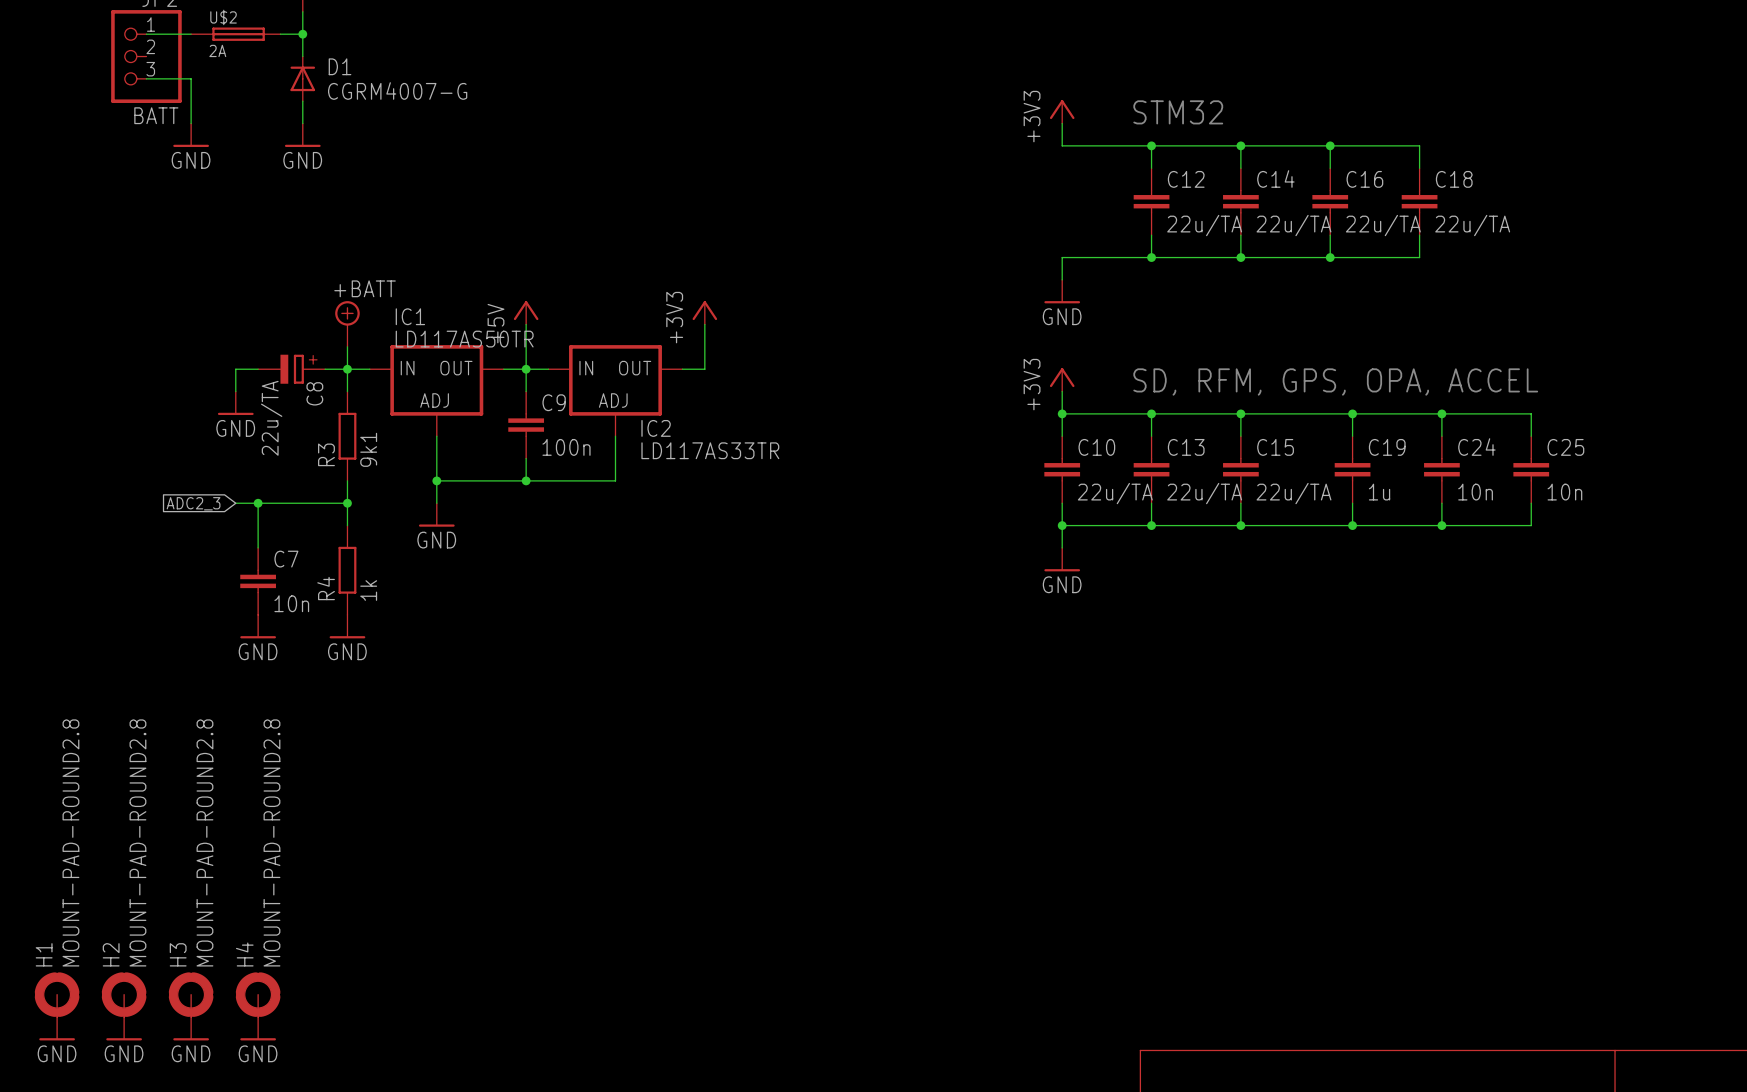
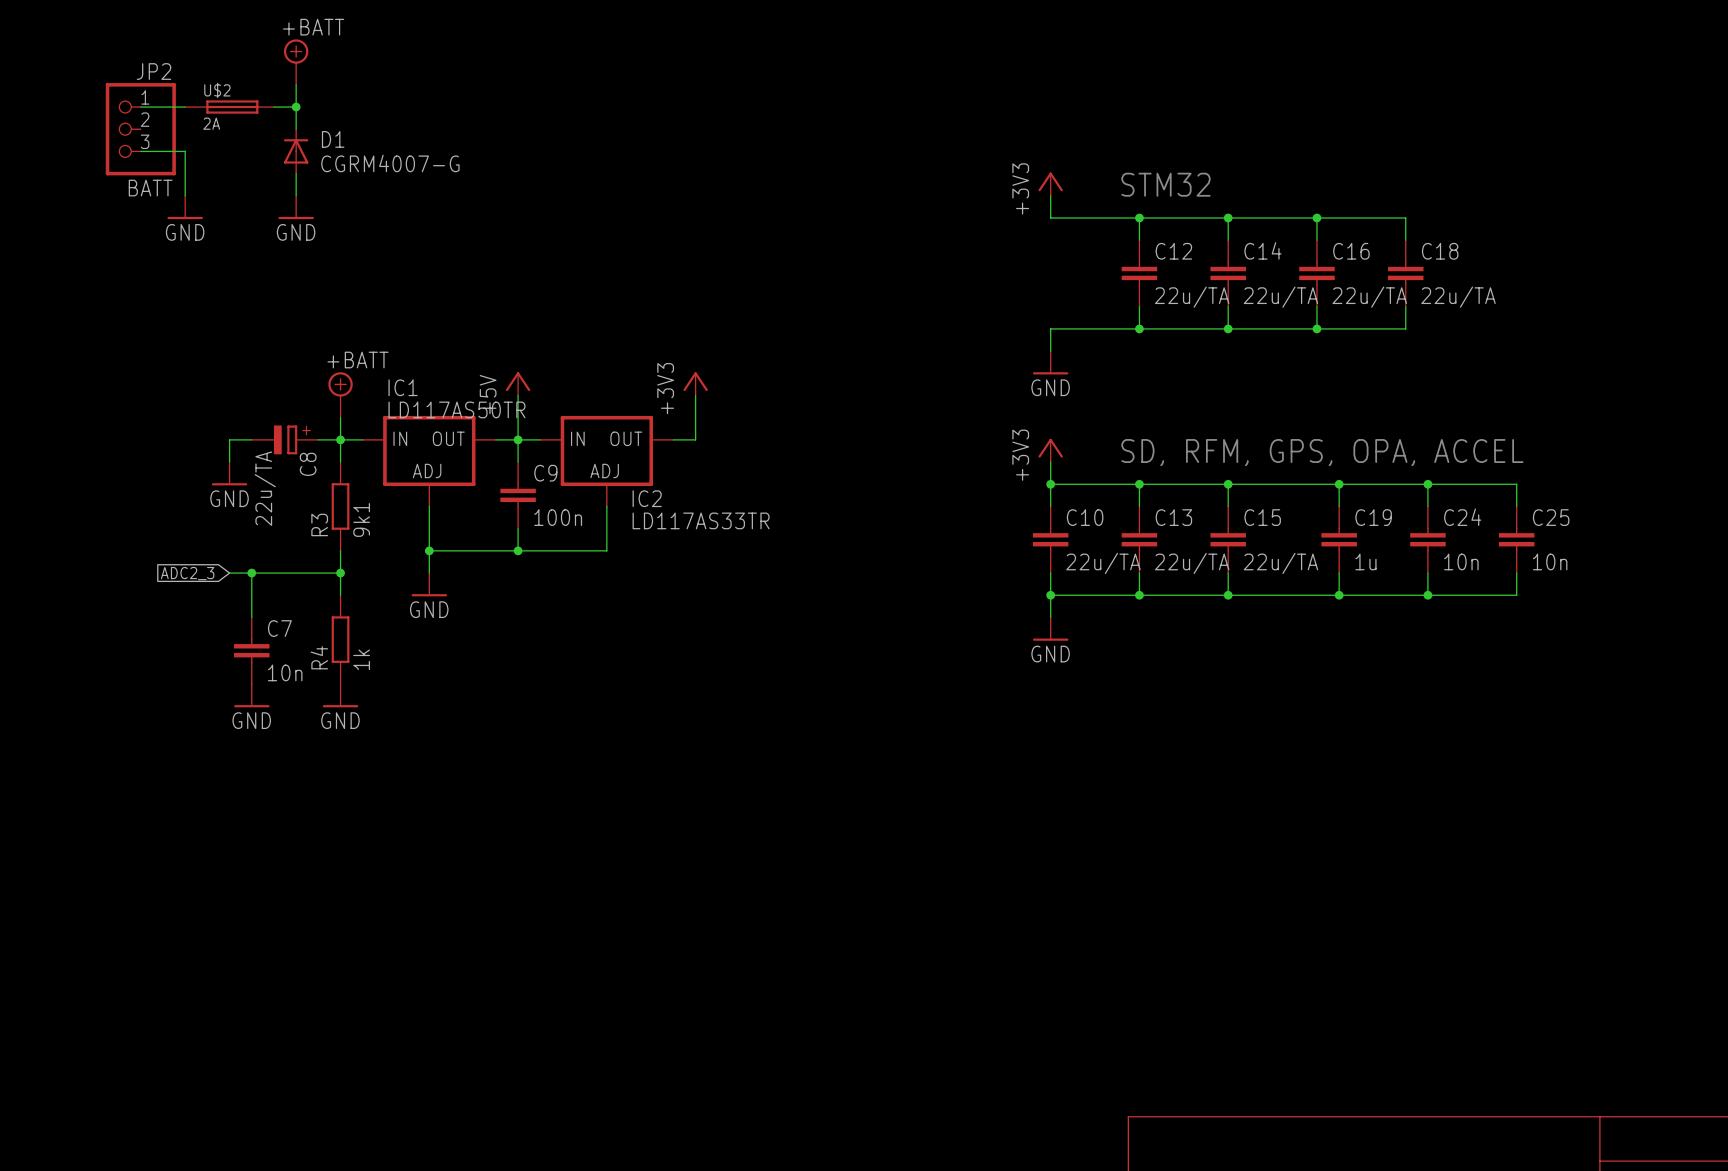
H1: MOUNT-PAD-ROUND2.8 (57, 994) -> none
H2: MOUNT-PAD-ROUND2.8 (124, 994) -> none
H3: MOUNT-PAD-ROUND2.8 (191, 994) -> none
H4: MOUNT-PAD-ROUND2.8 (258, 994) -> none
power symbol: GND (57, 1028) -> none
power symbol: GND (124, 1028) -> none
power symbol: GND (191, 1028) -> none
power symbol: GND (258, 1028) -> none

